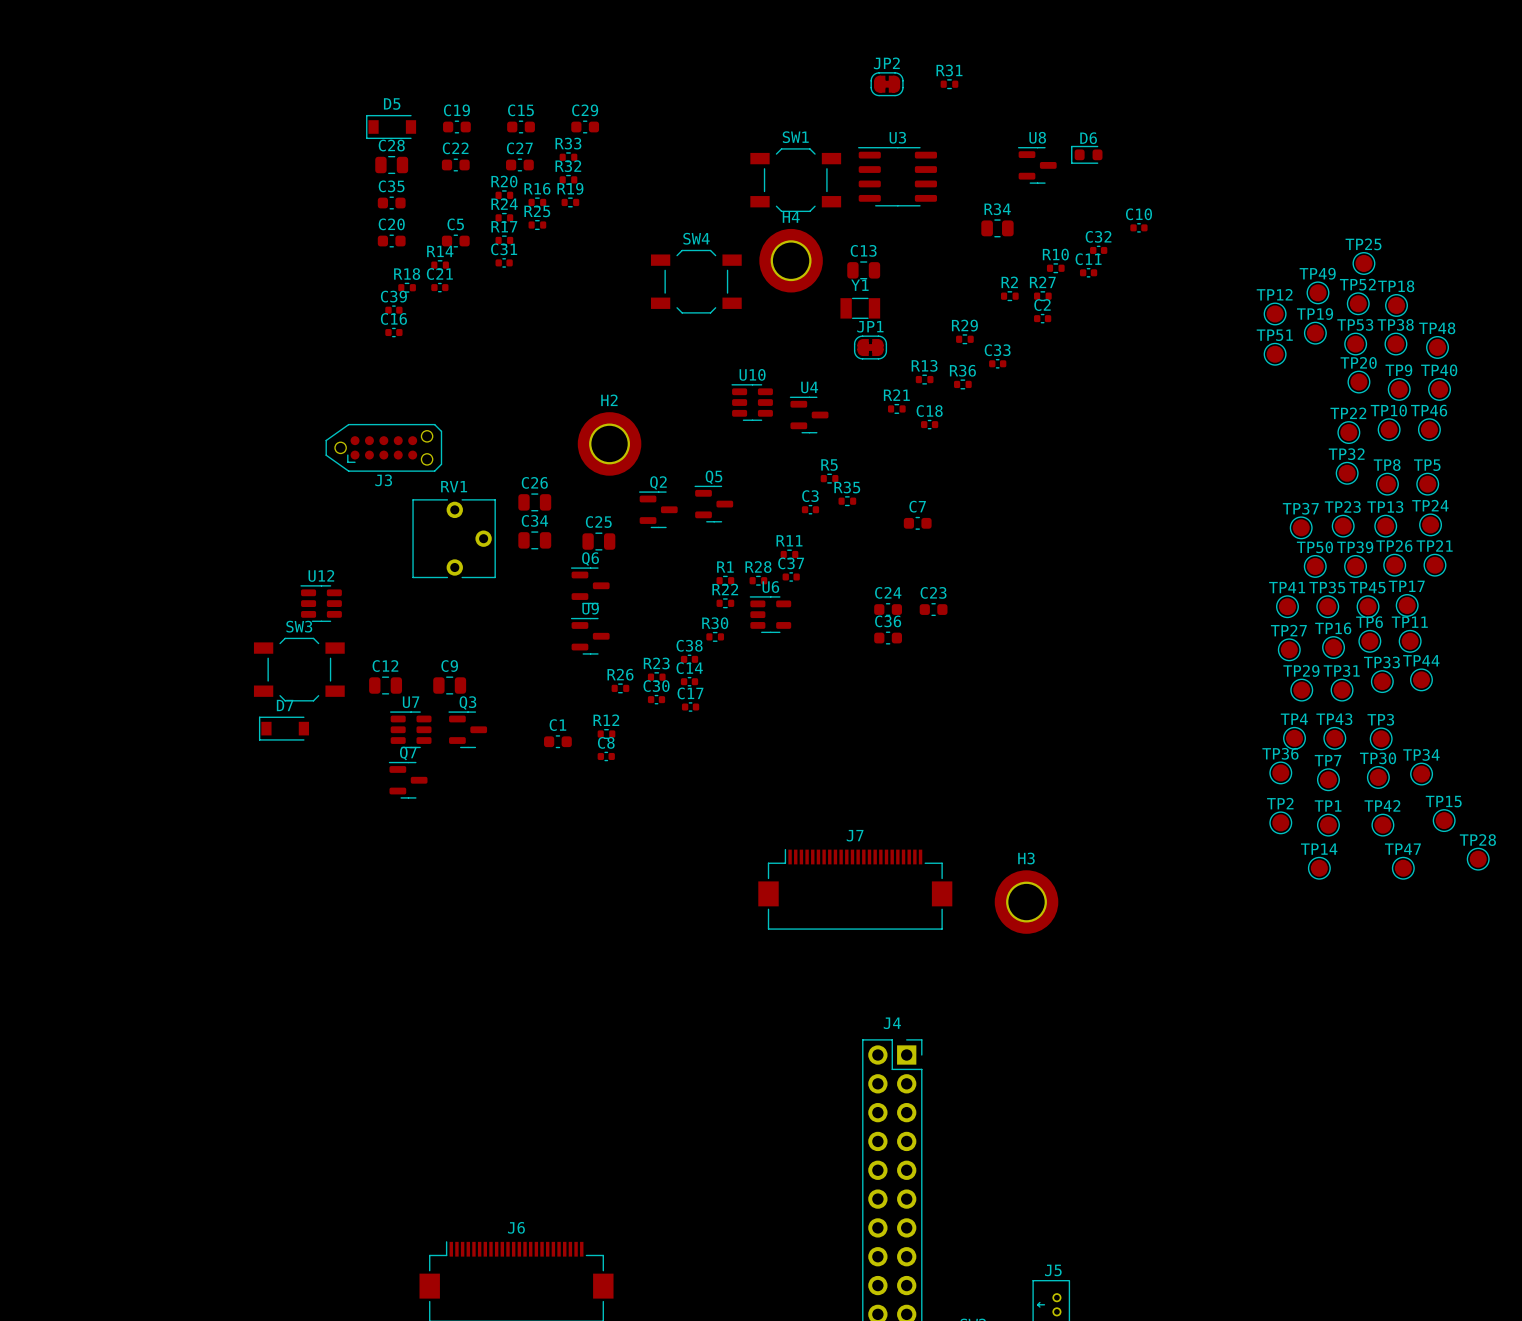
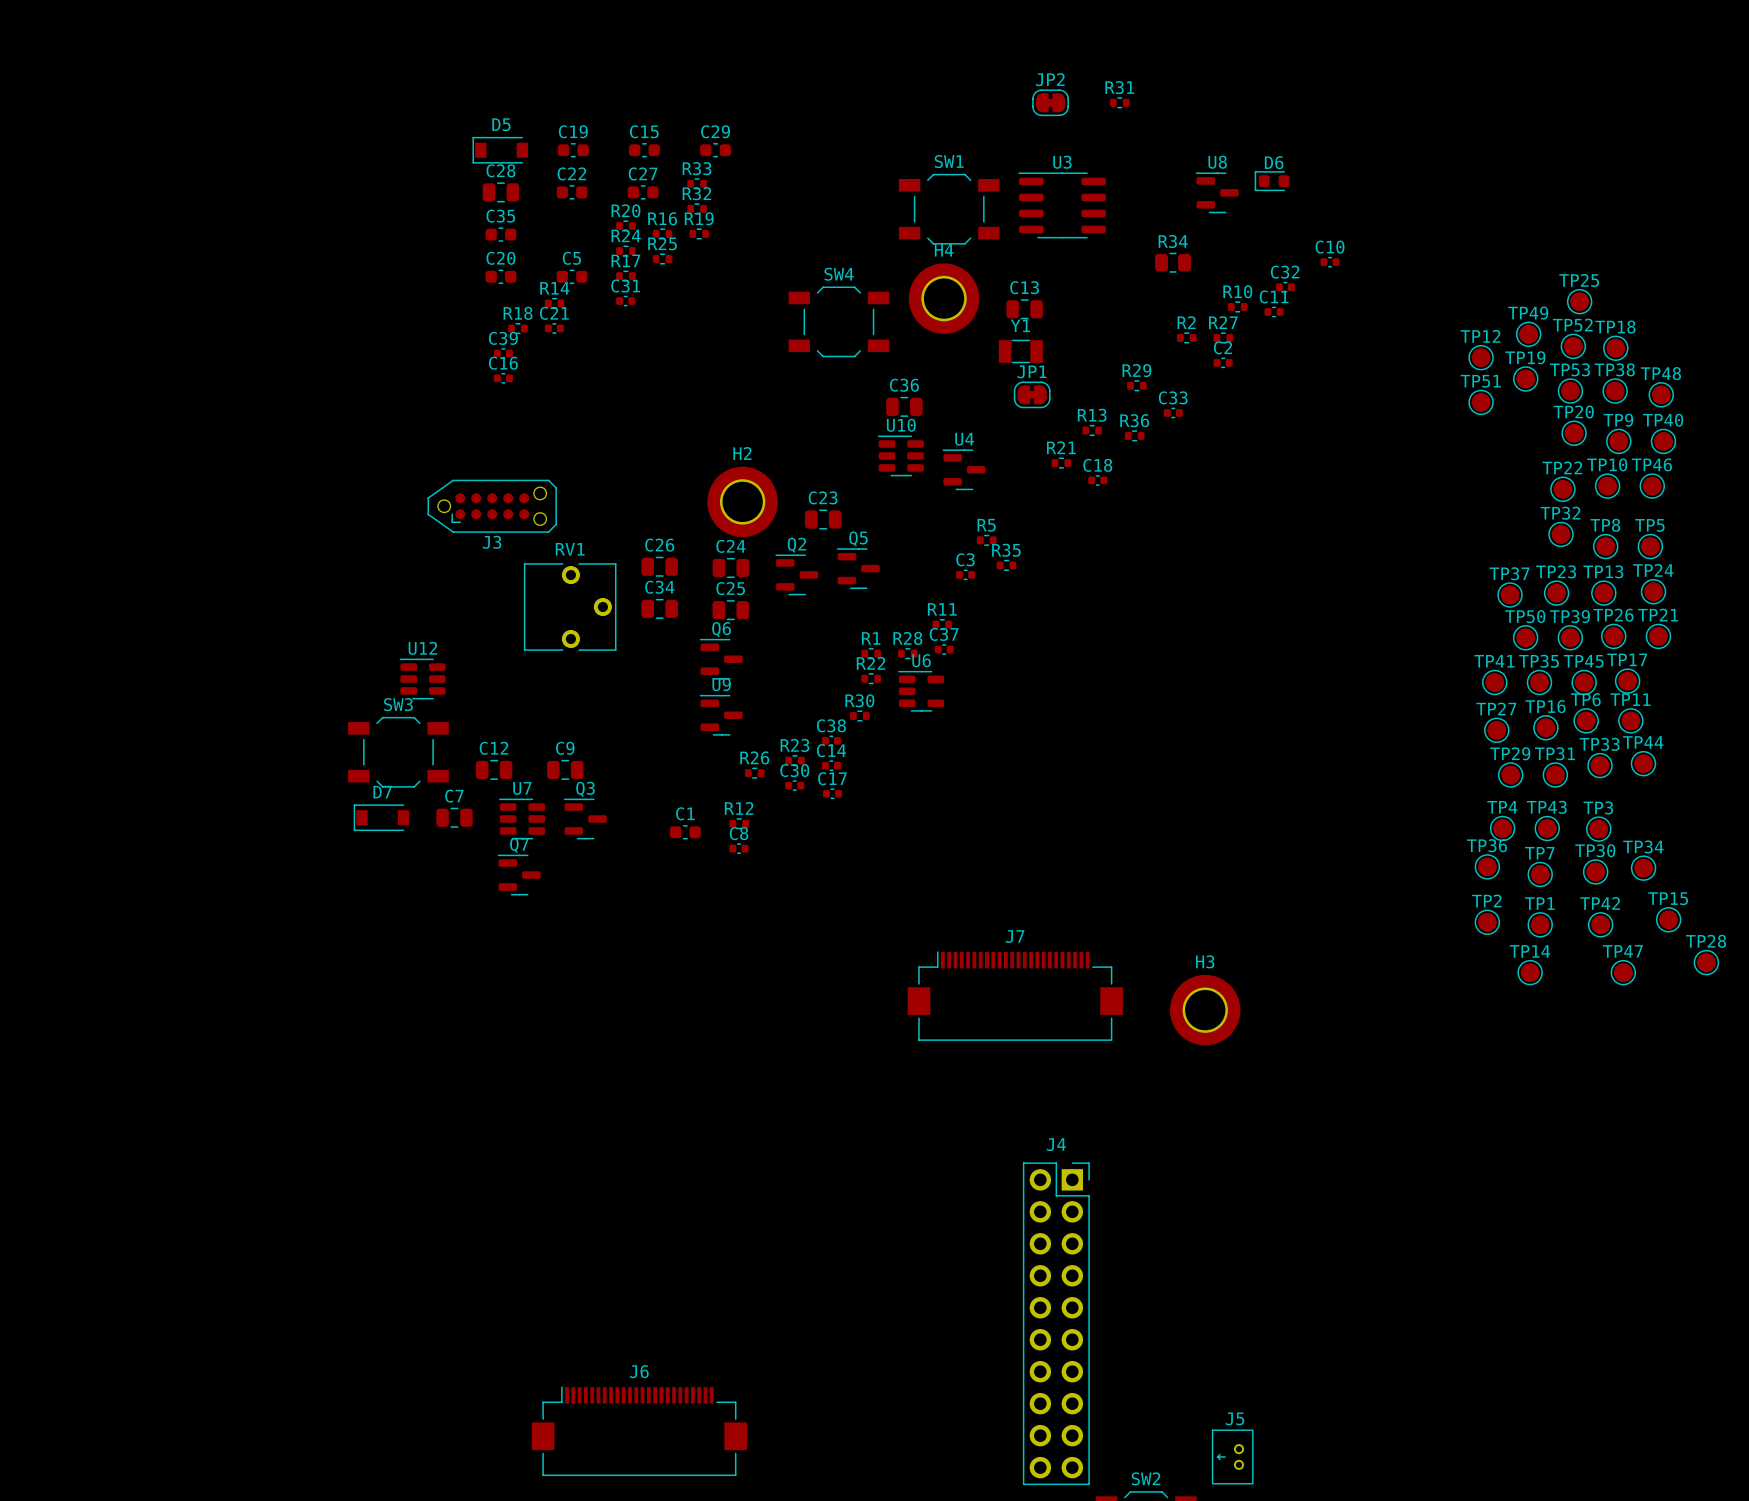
C7 footprint: [903, 516, 932, 530] -> [436, 807, 473, 828]
C24 footprint: [874, 603, 902, 617] -> [712, 557, 750, 579]
C23 footprint: [919, 603, 948, 617] -> [804, 509, 842, 530]
C36 footprint: [874, 631, 902, 645] -> [886, 396, 923, 417]

